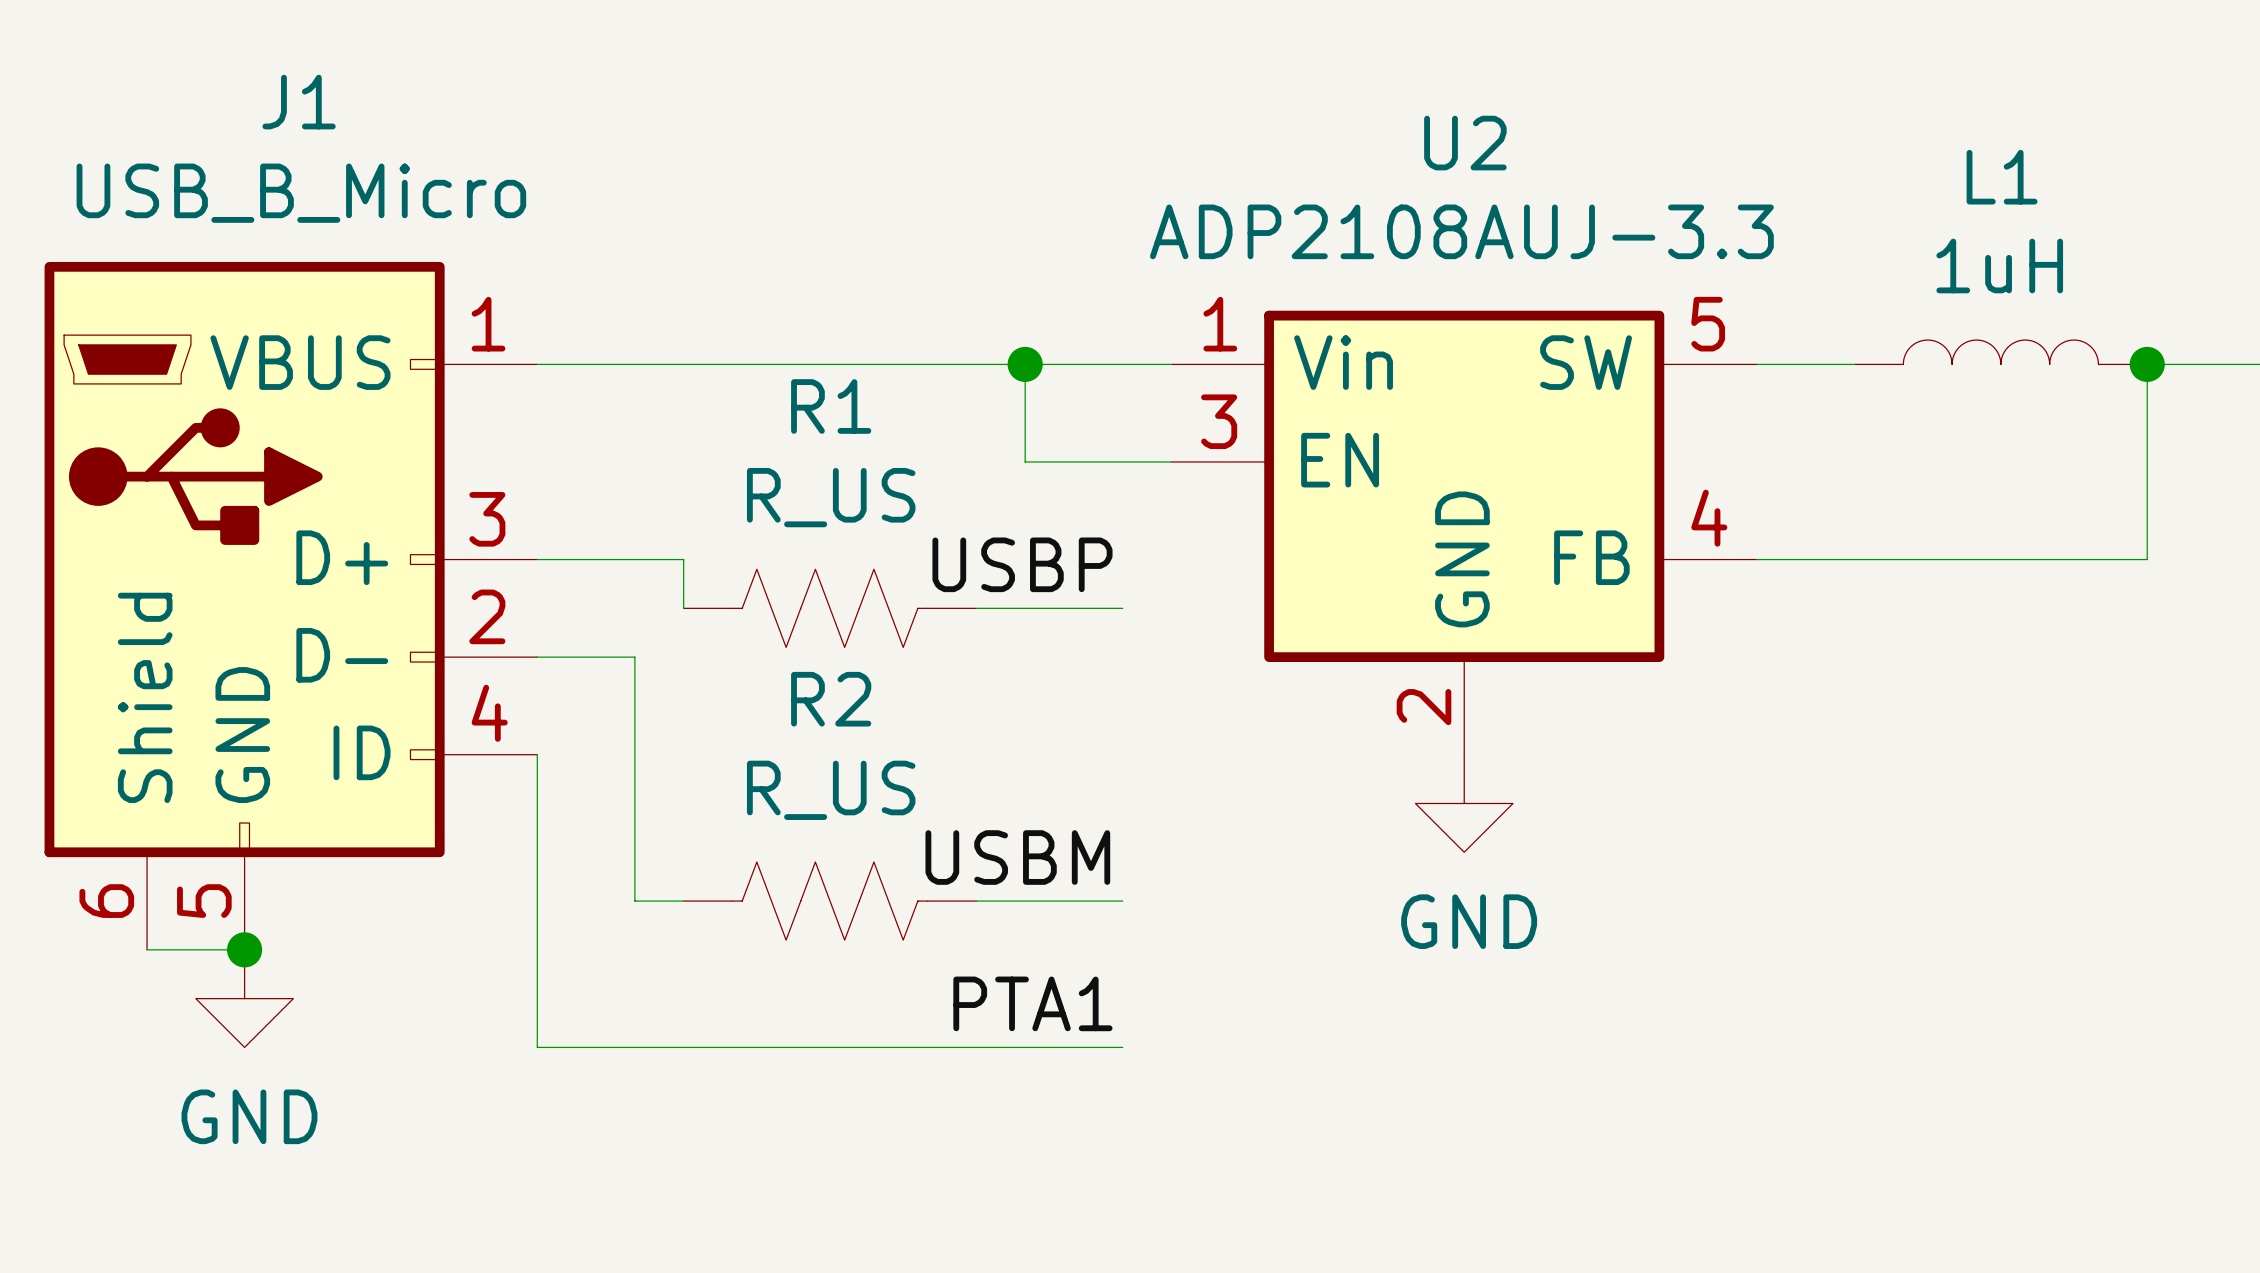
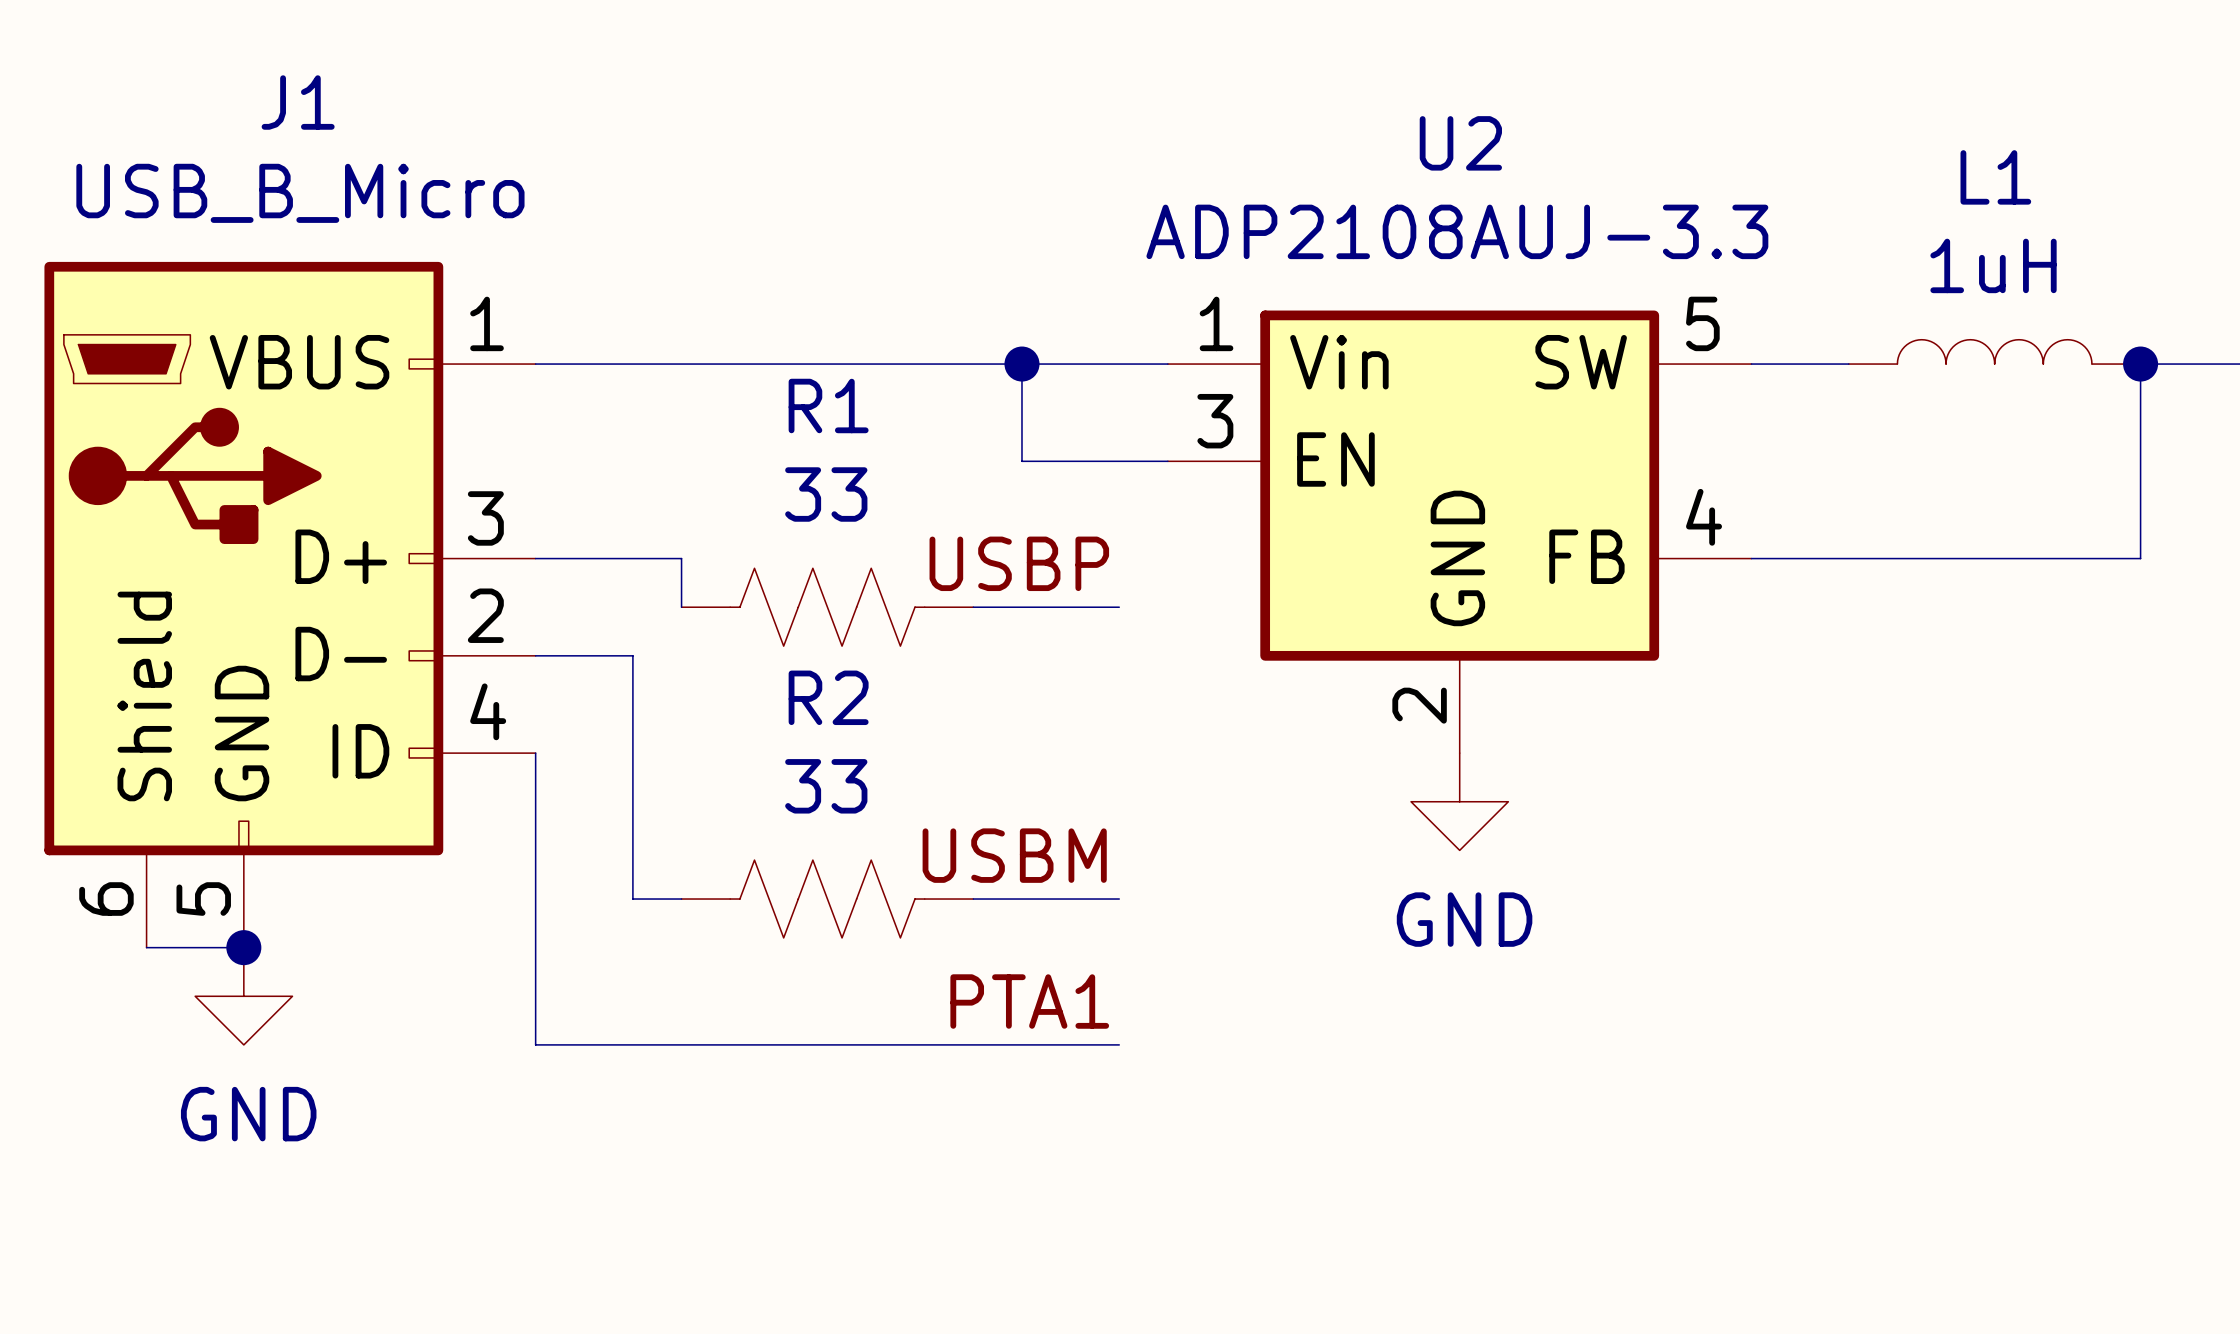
R1 value: R_US (831, 497) -> 33 (826, 494)
R2 value: R_US (831, 790) -> 33 (826, 786)

